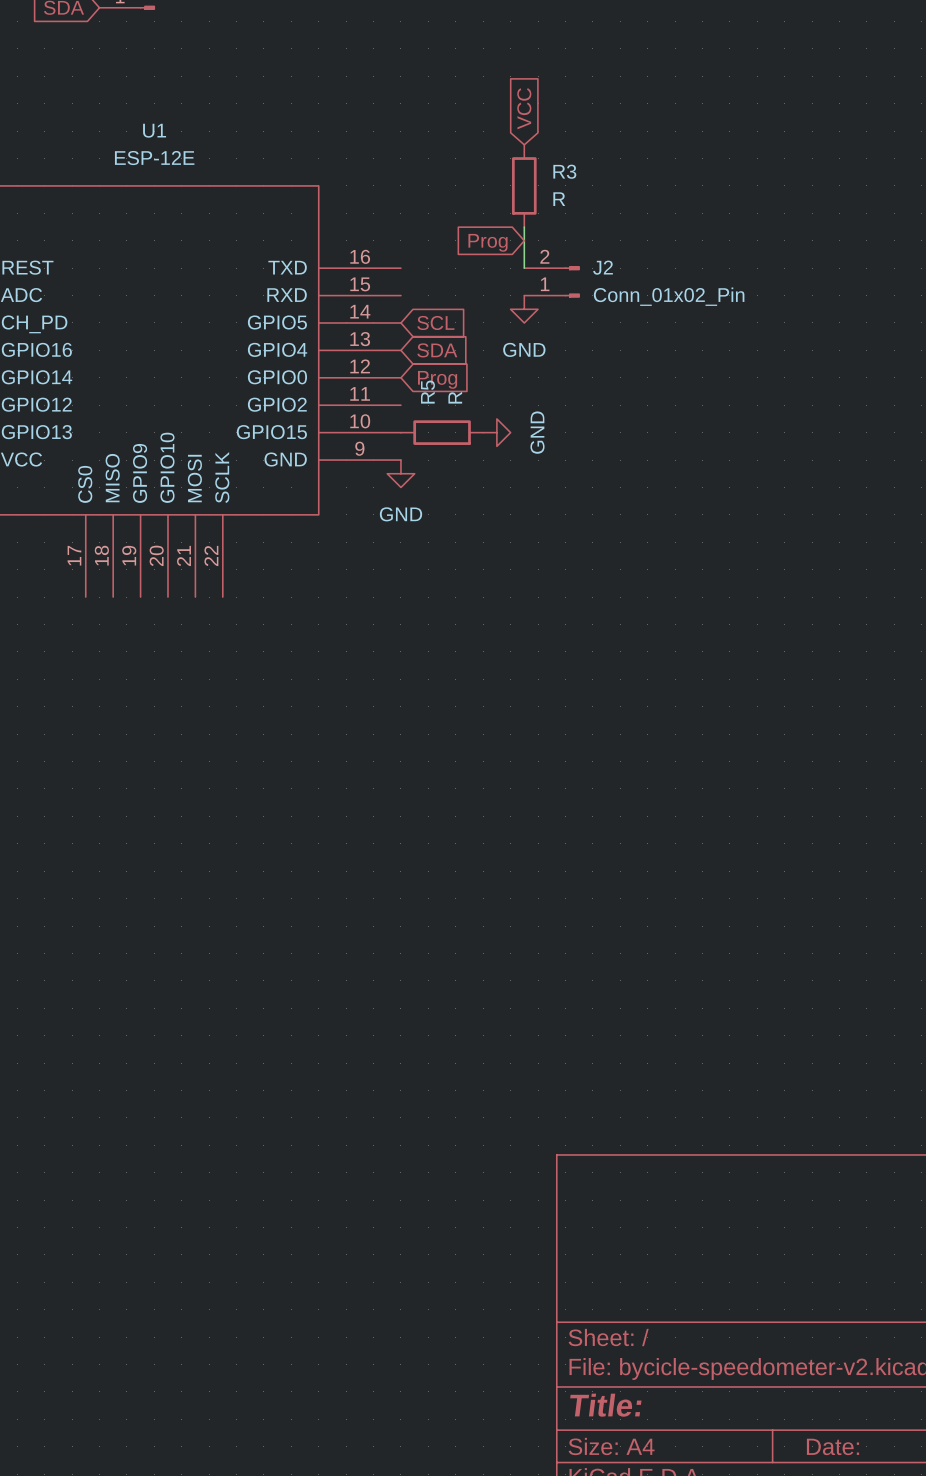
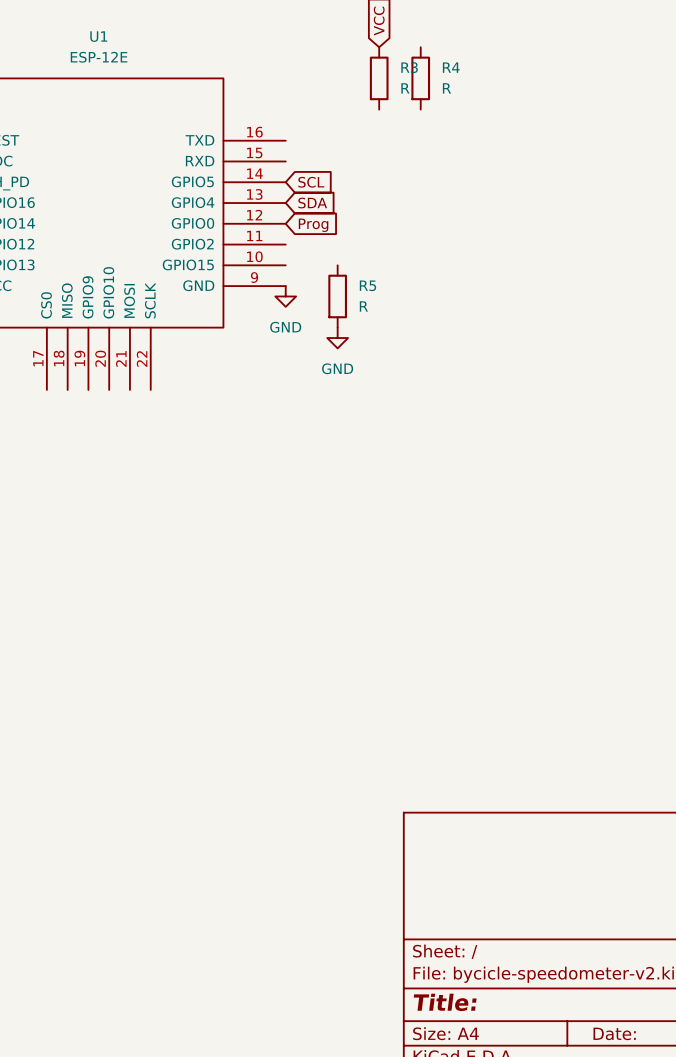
R4: none -> R (420, 78)
wire: (524, 227) (524, 268) -> none
global label: Prog (488, 242) -> none
J2: Conn_01x02_Pin (552, 281) -> none
power symbol: GND (524, 309) -> none
R5 rotation: 0° (442, 432) -> 90° clockwise (337, 296)
R5 position: (442, 432) -> (337, 296)
power symbol rotation: 0° (496, 432) -> 90° clockwise (337, 338)
power symbol position: GND (496, 432) -> GND (337, 338)

